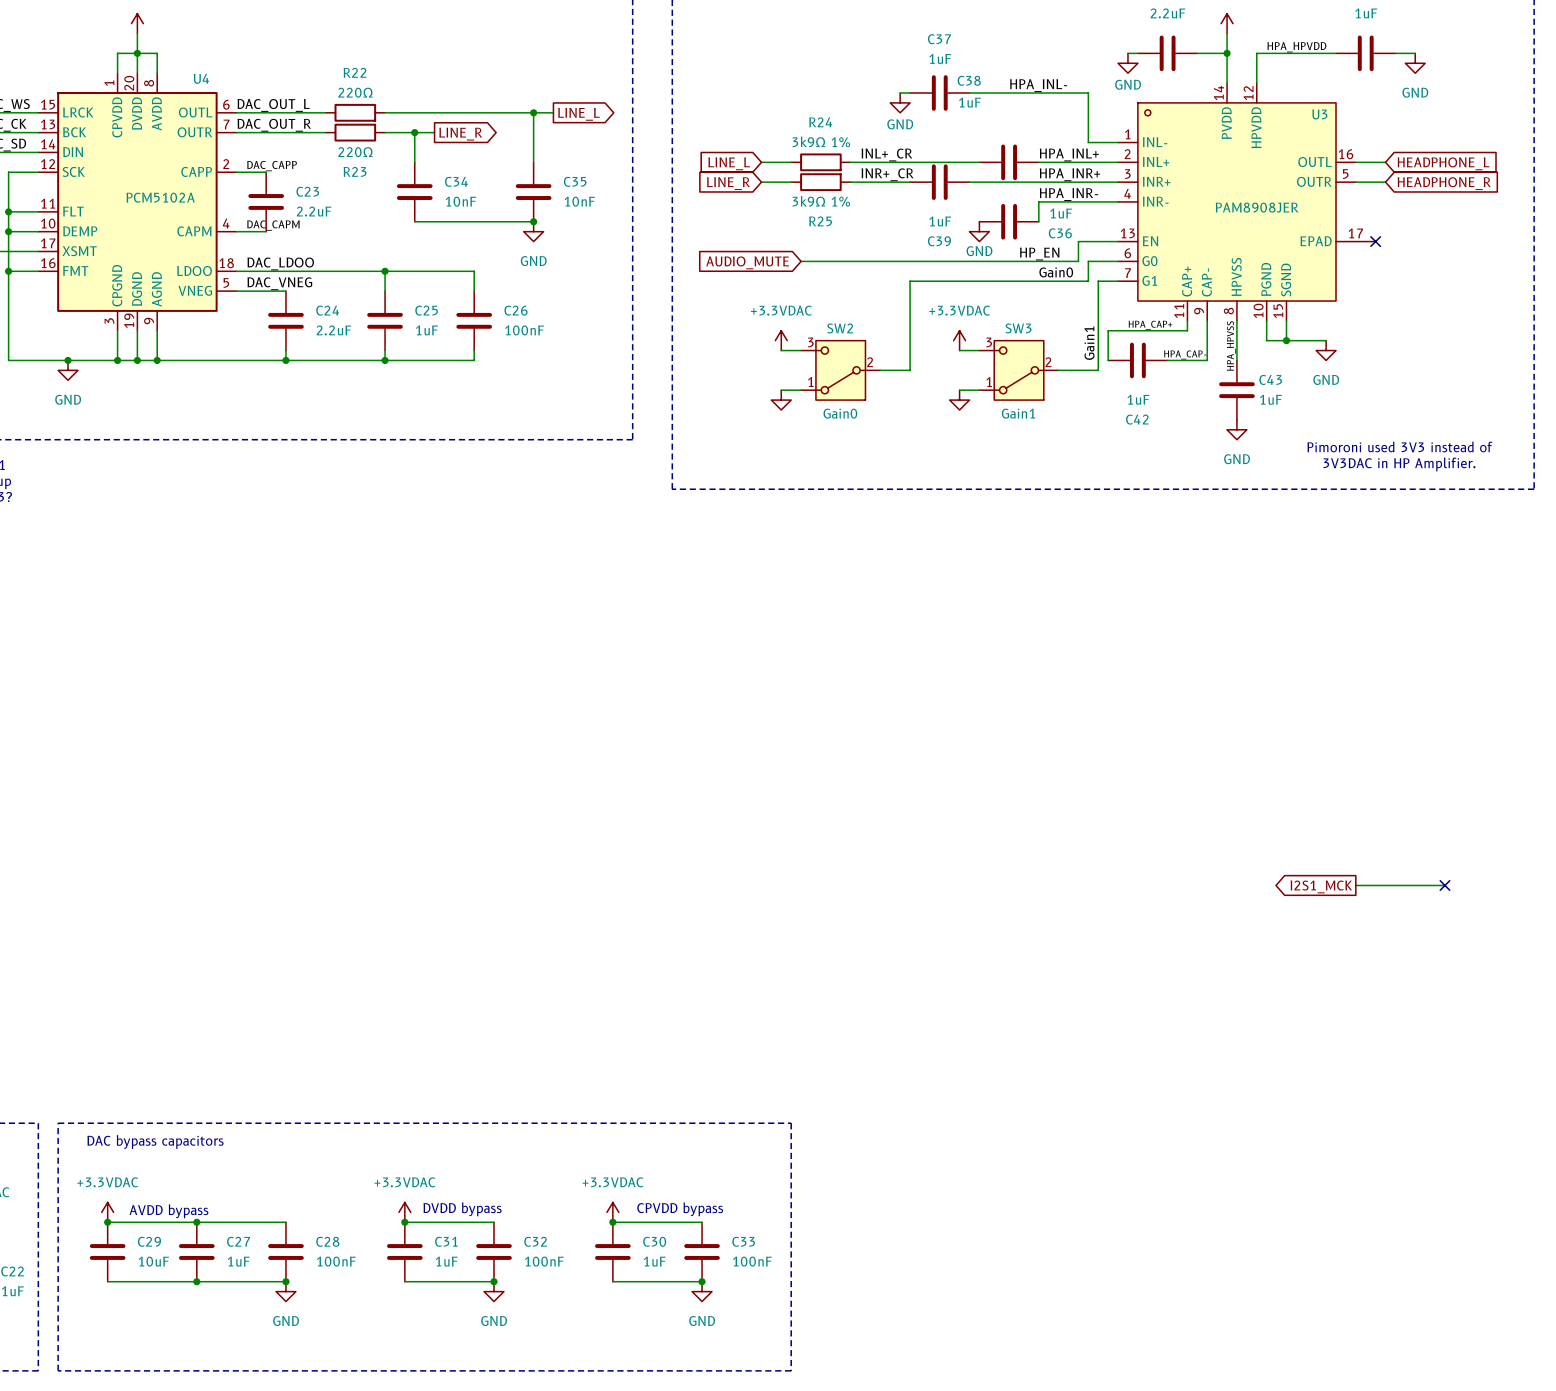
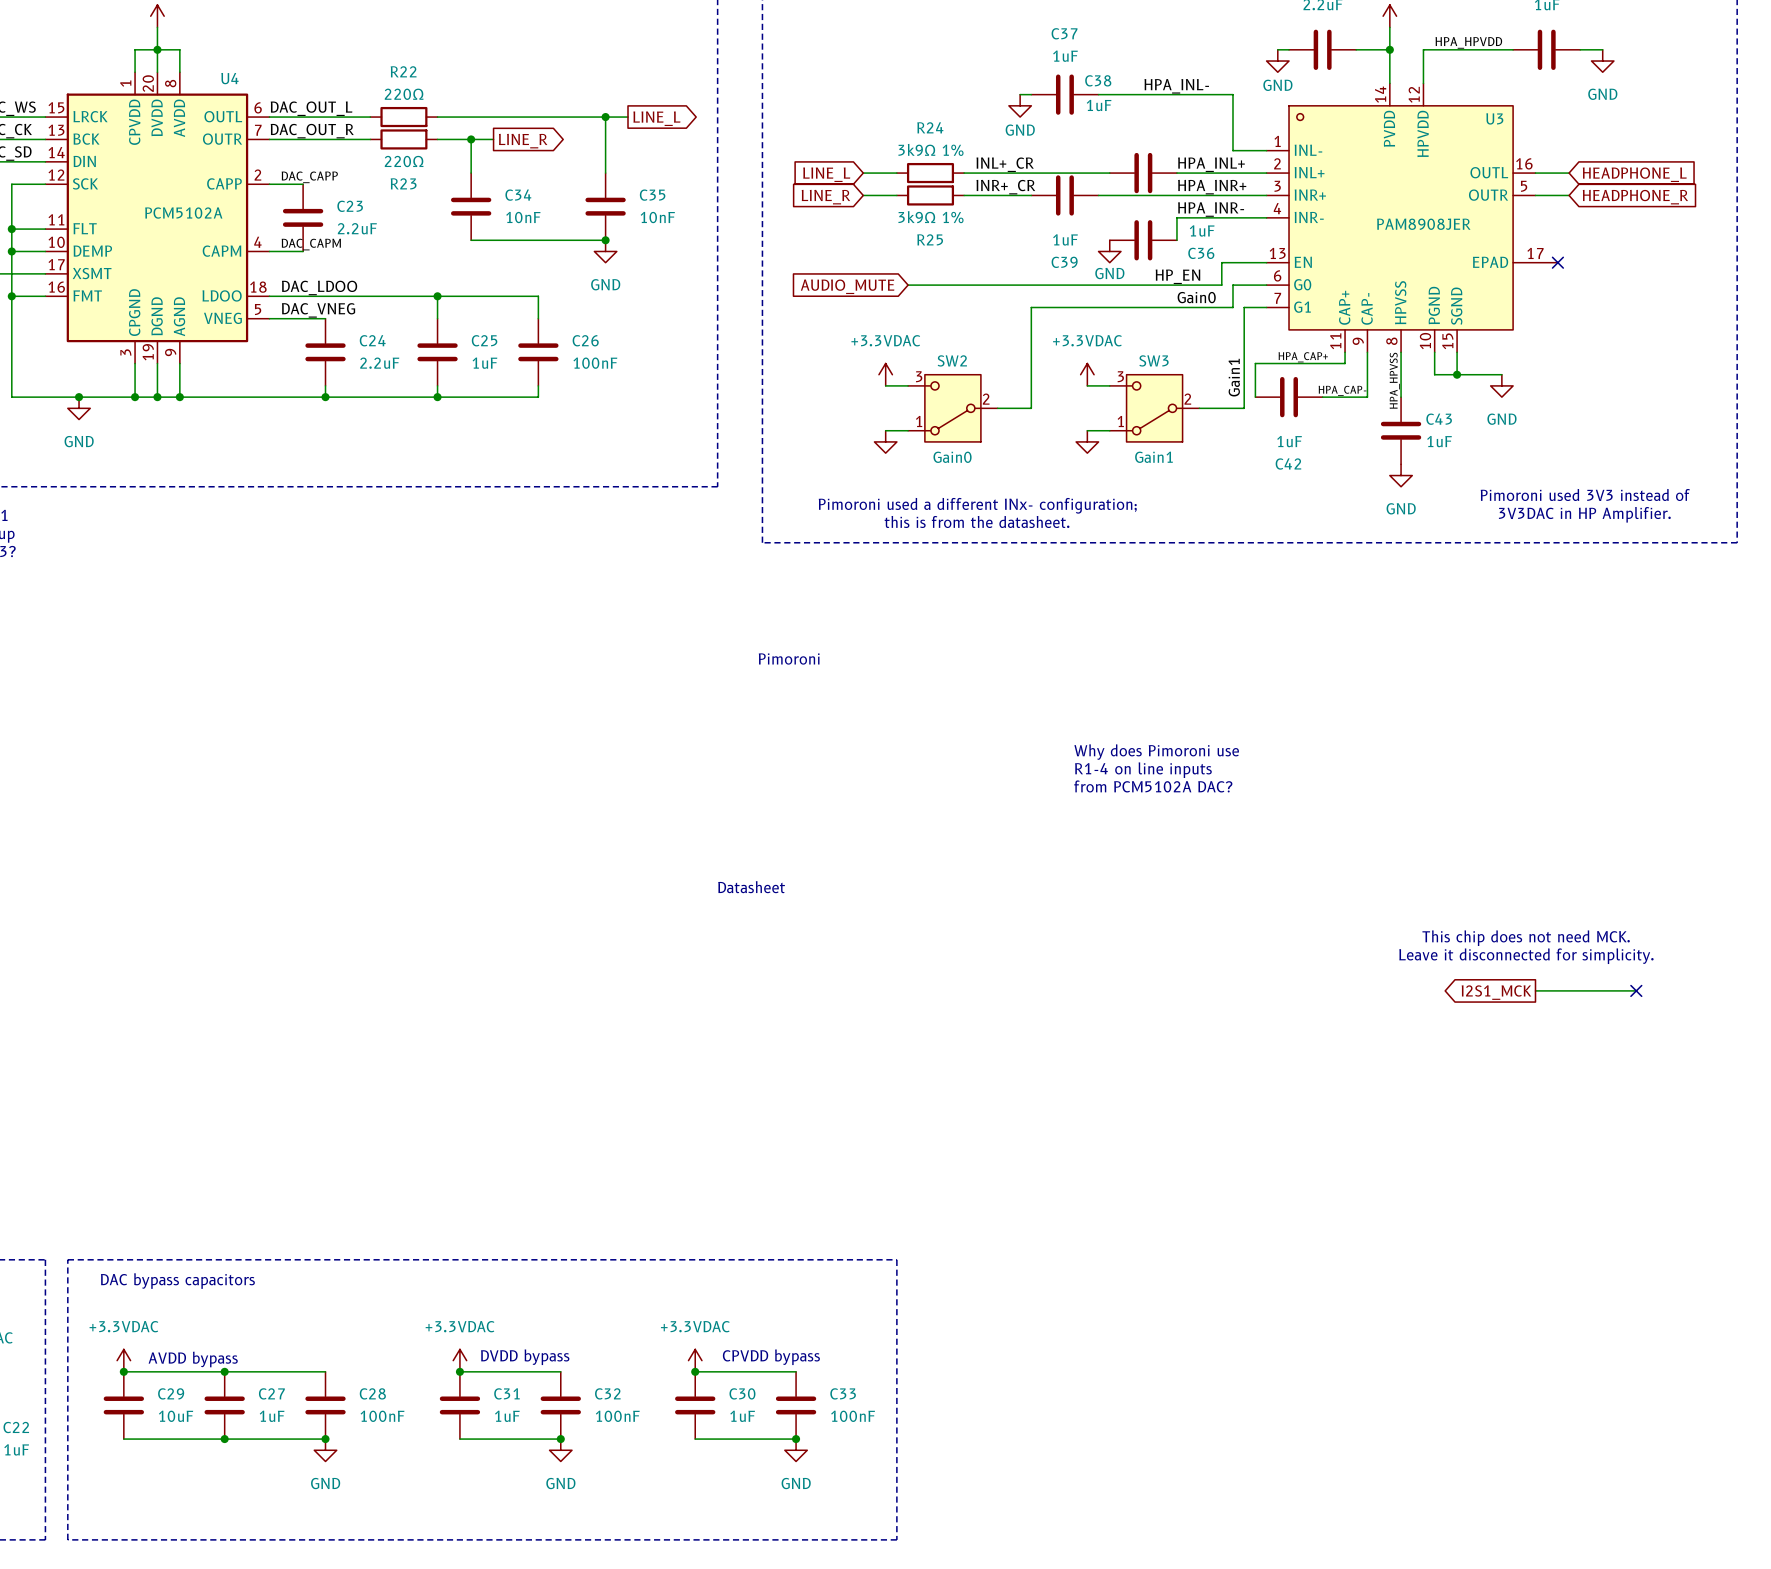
text: none -> Pimoroni used a different INx- configuration; (977, 505)
text: none -> this is from the datasheet. (977, 521)
text: none -> Pimoroni (789, 659)
text: none -> Why does Pimoroni use (1156, 752)
text: none -> R1-4 on line inputs (1143, 770)
text: none -> from PCM5102A DAC? (1153, 786)
text: none -> Datasheet (751, 887)
text: none -> This chip does not need MCK. (1526, 938)
text: none -> Leave it disconnected for simplicity. (1526, 956)

